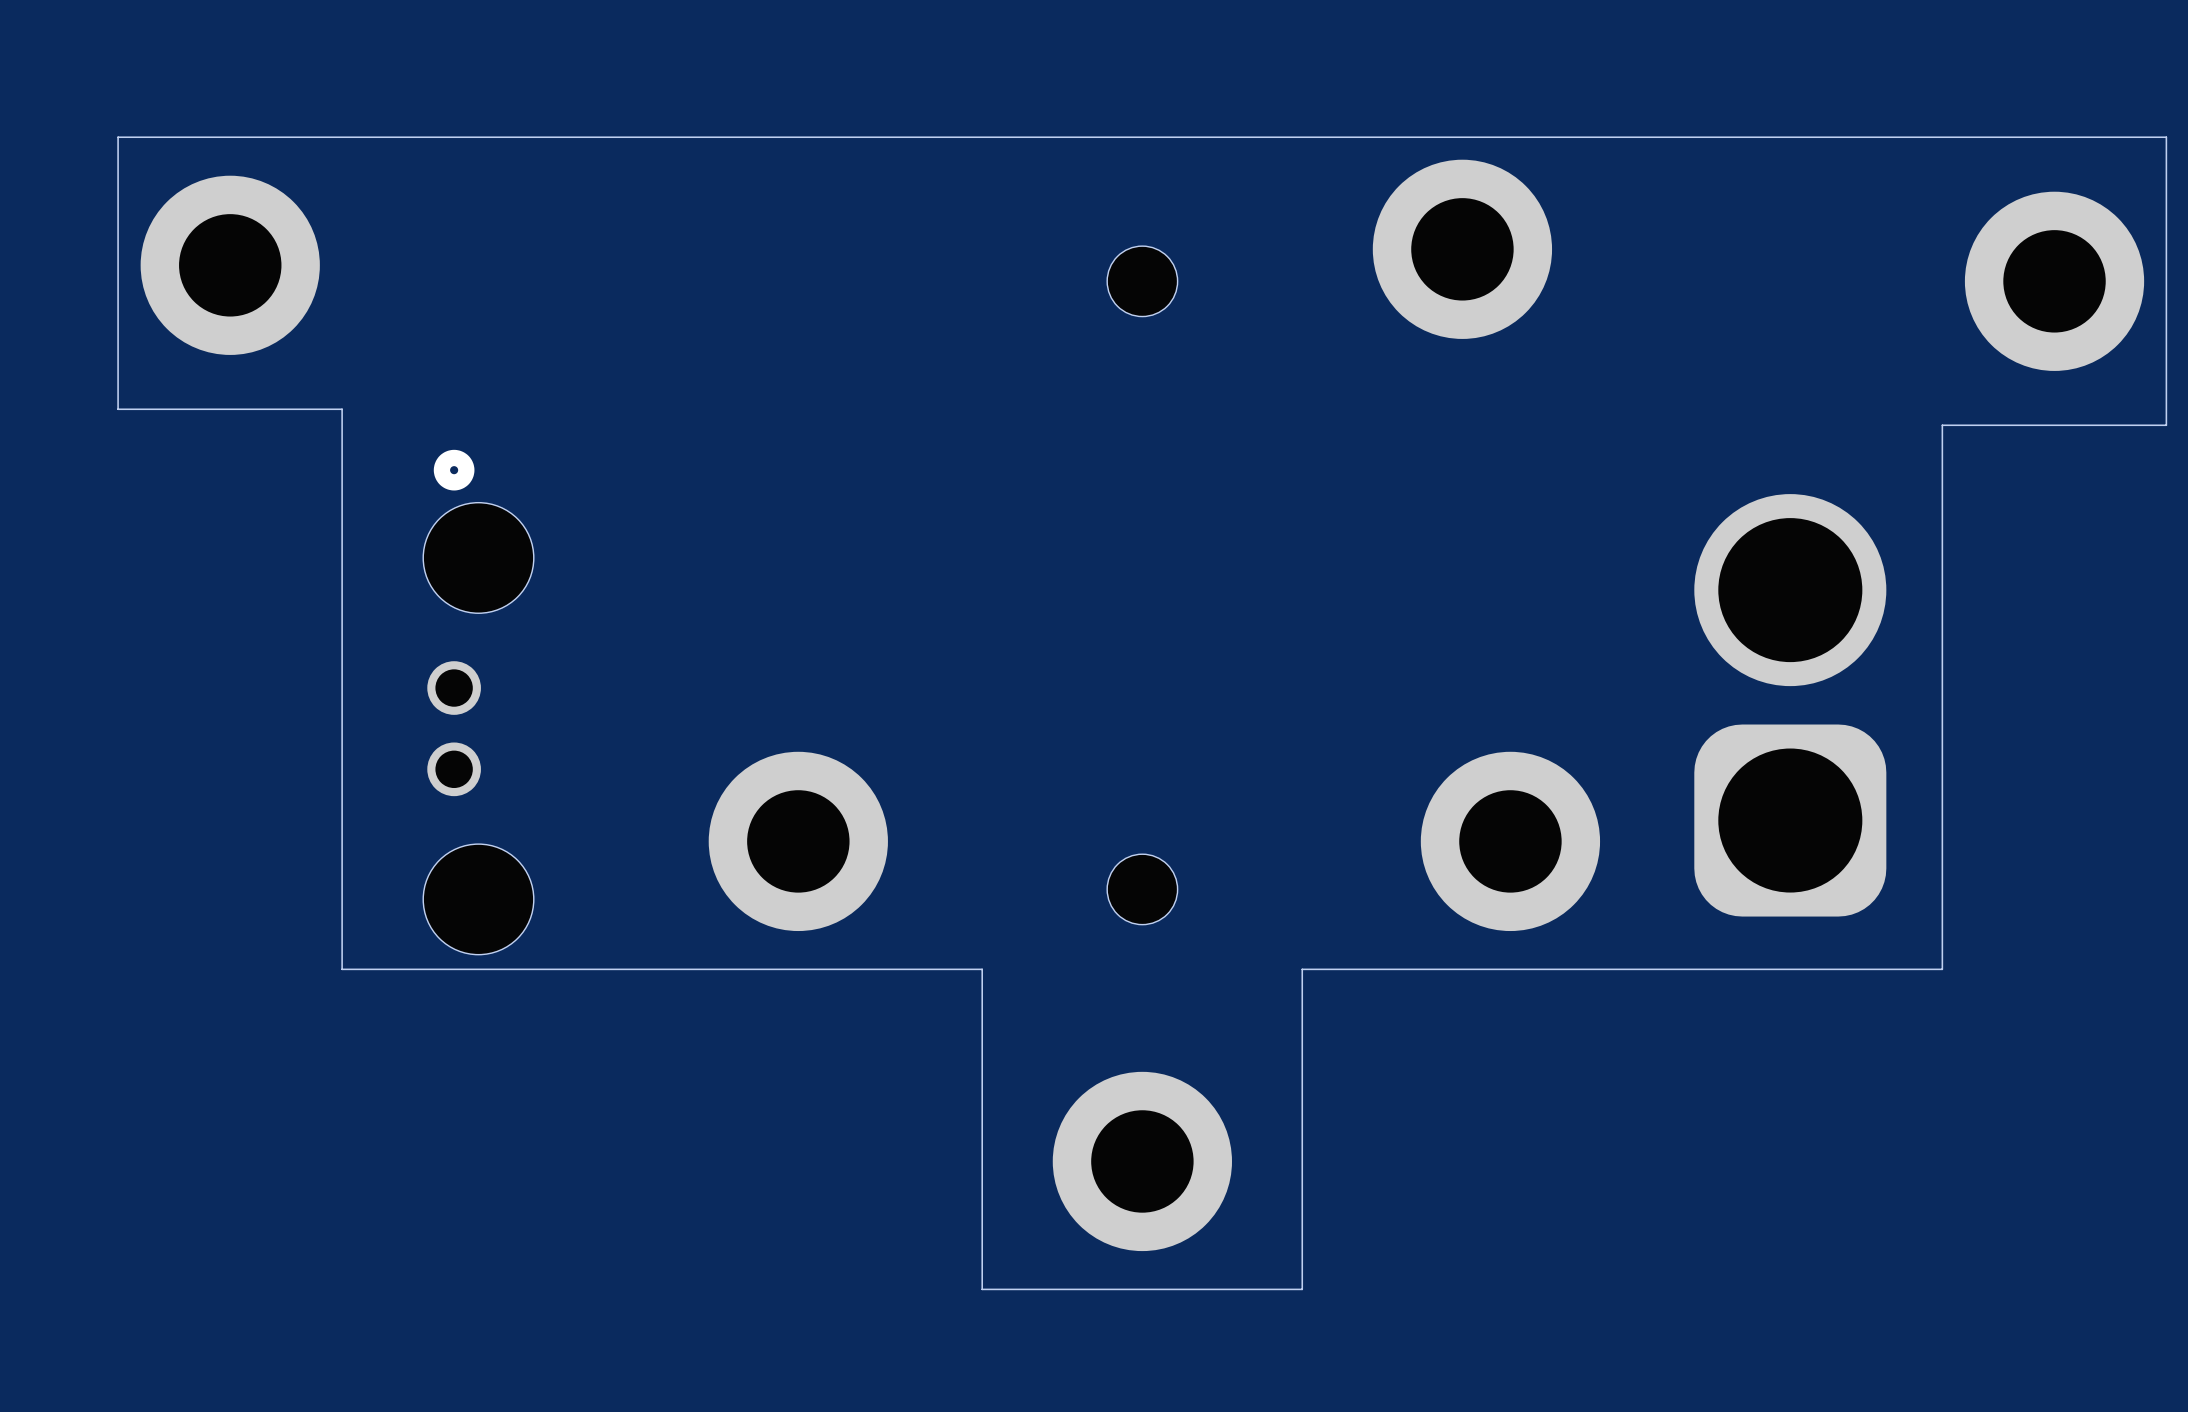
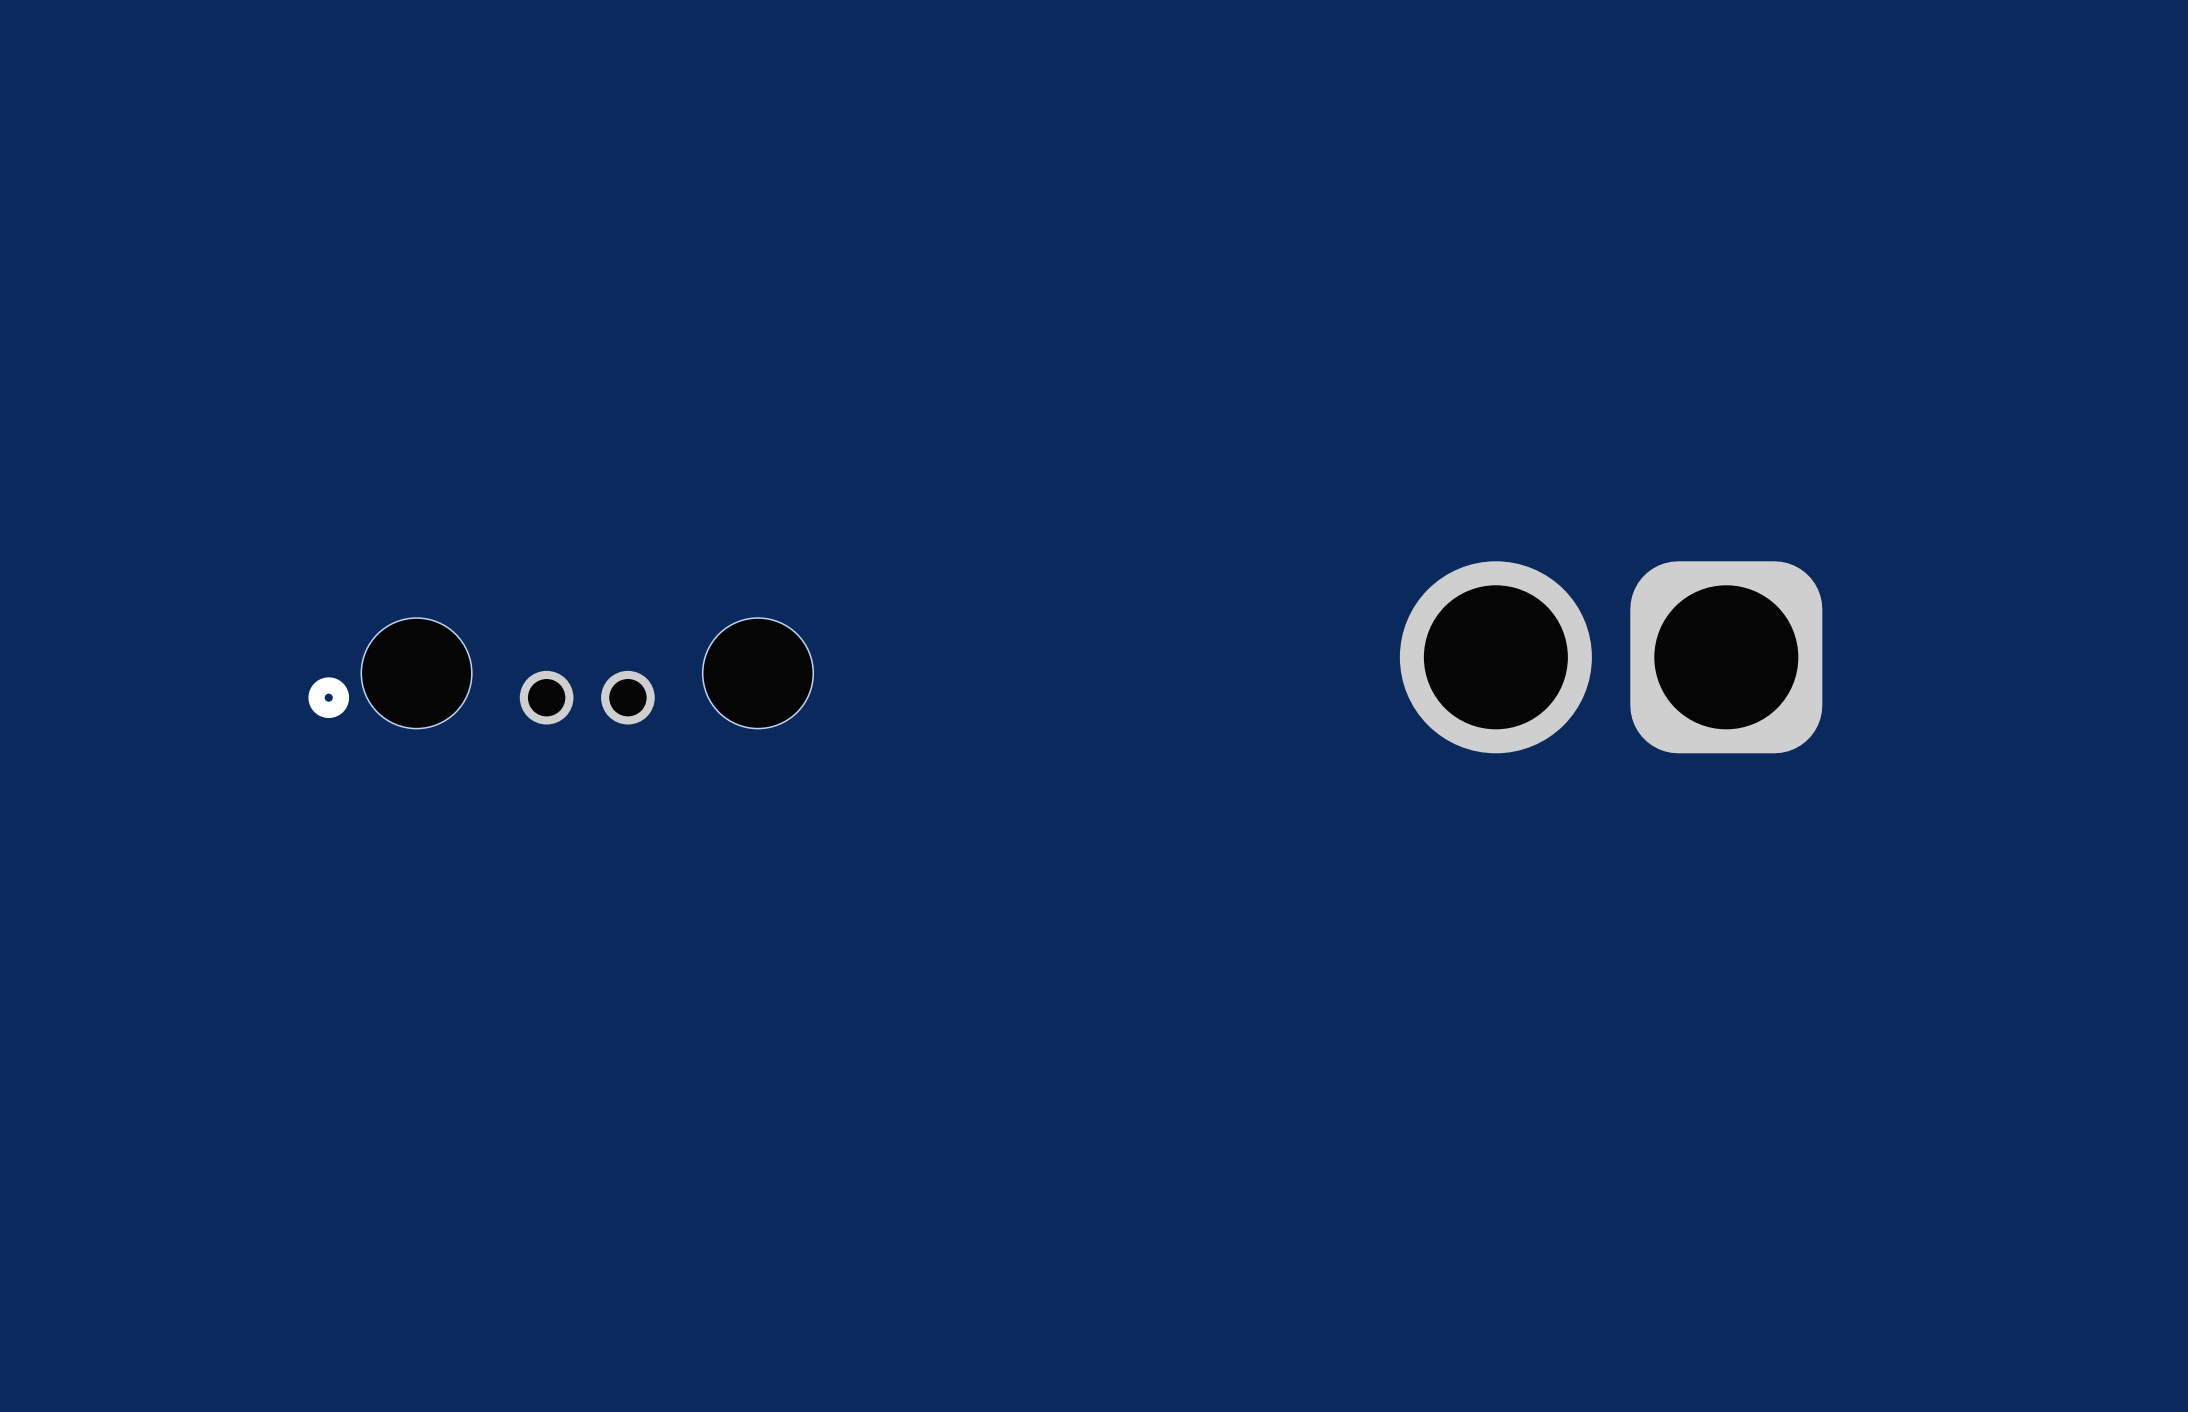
board edge: (2166, 137) (118, 137) (118, 409) (342, 409) (342, 969) (982, 969) (982, 1289) (1302, 1289) (1302, 969) (1942, 969) (1942, 425) (2166, 425) (2166, 137) -> none
part: (1462, 249) -> none
part: (230, 265) -> none
part: (1142, 281) -> none
part: (2054, 281) -> none
part rotation: 0° (478, 702) -> 90° counterclockwise (560, 673)
part rotation: 0° (1790, 705) -> 90° counterclockwise (1611, 657)
part: (798, 841) -> none
part: (1510, 841) -> none
part: (1142, 889) -> none
part: (1142, 1161) -> none

